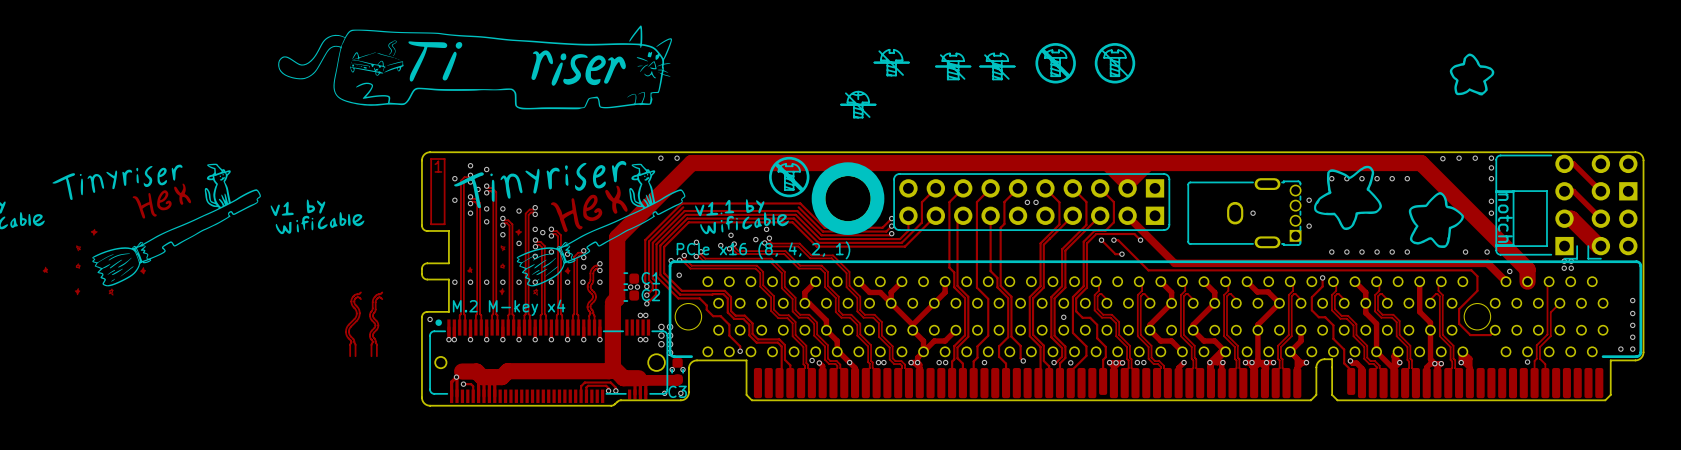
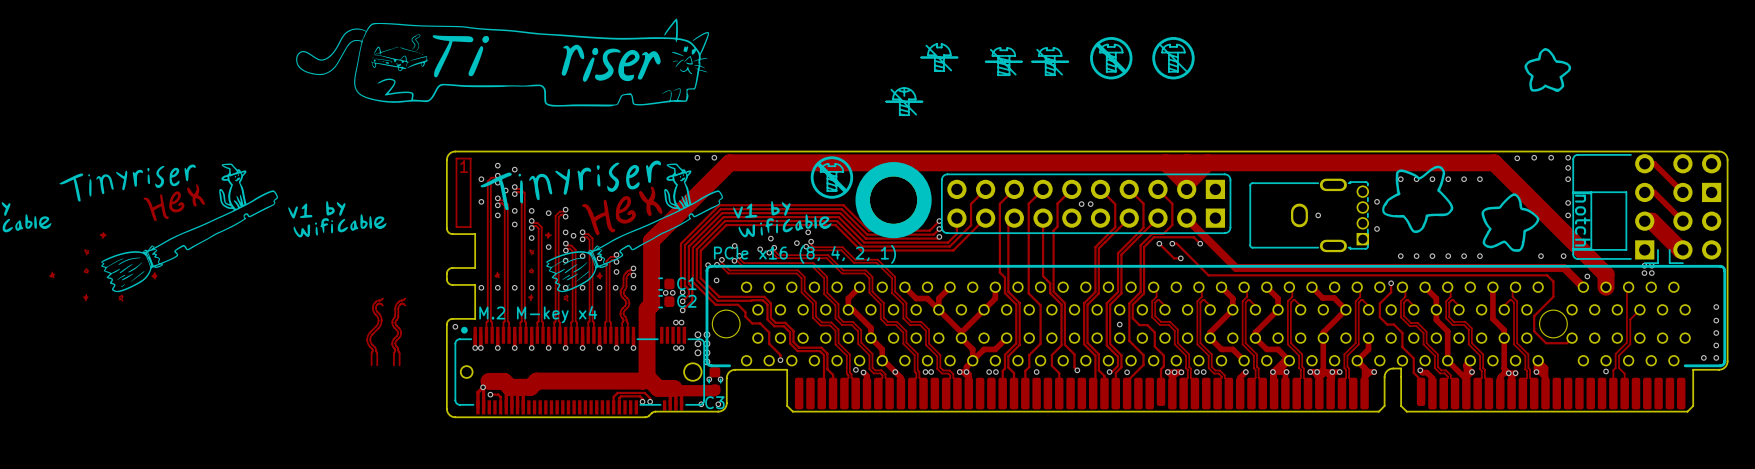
drawing shape: [454, 160, 789, 287] -> [474, 160, 832, 293]
track: none -> (720, 209) (841, 209)

